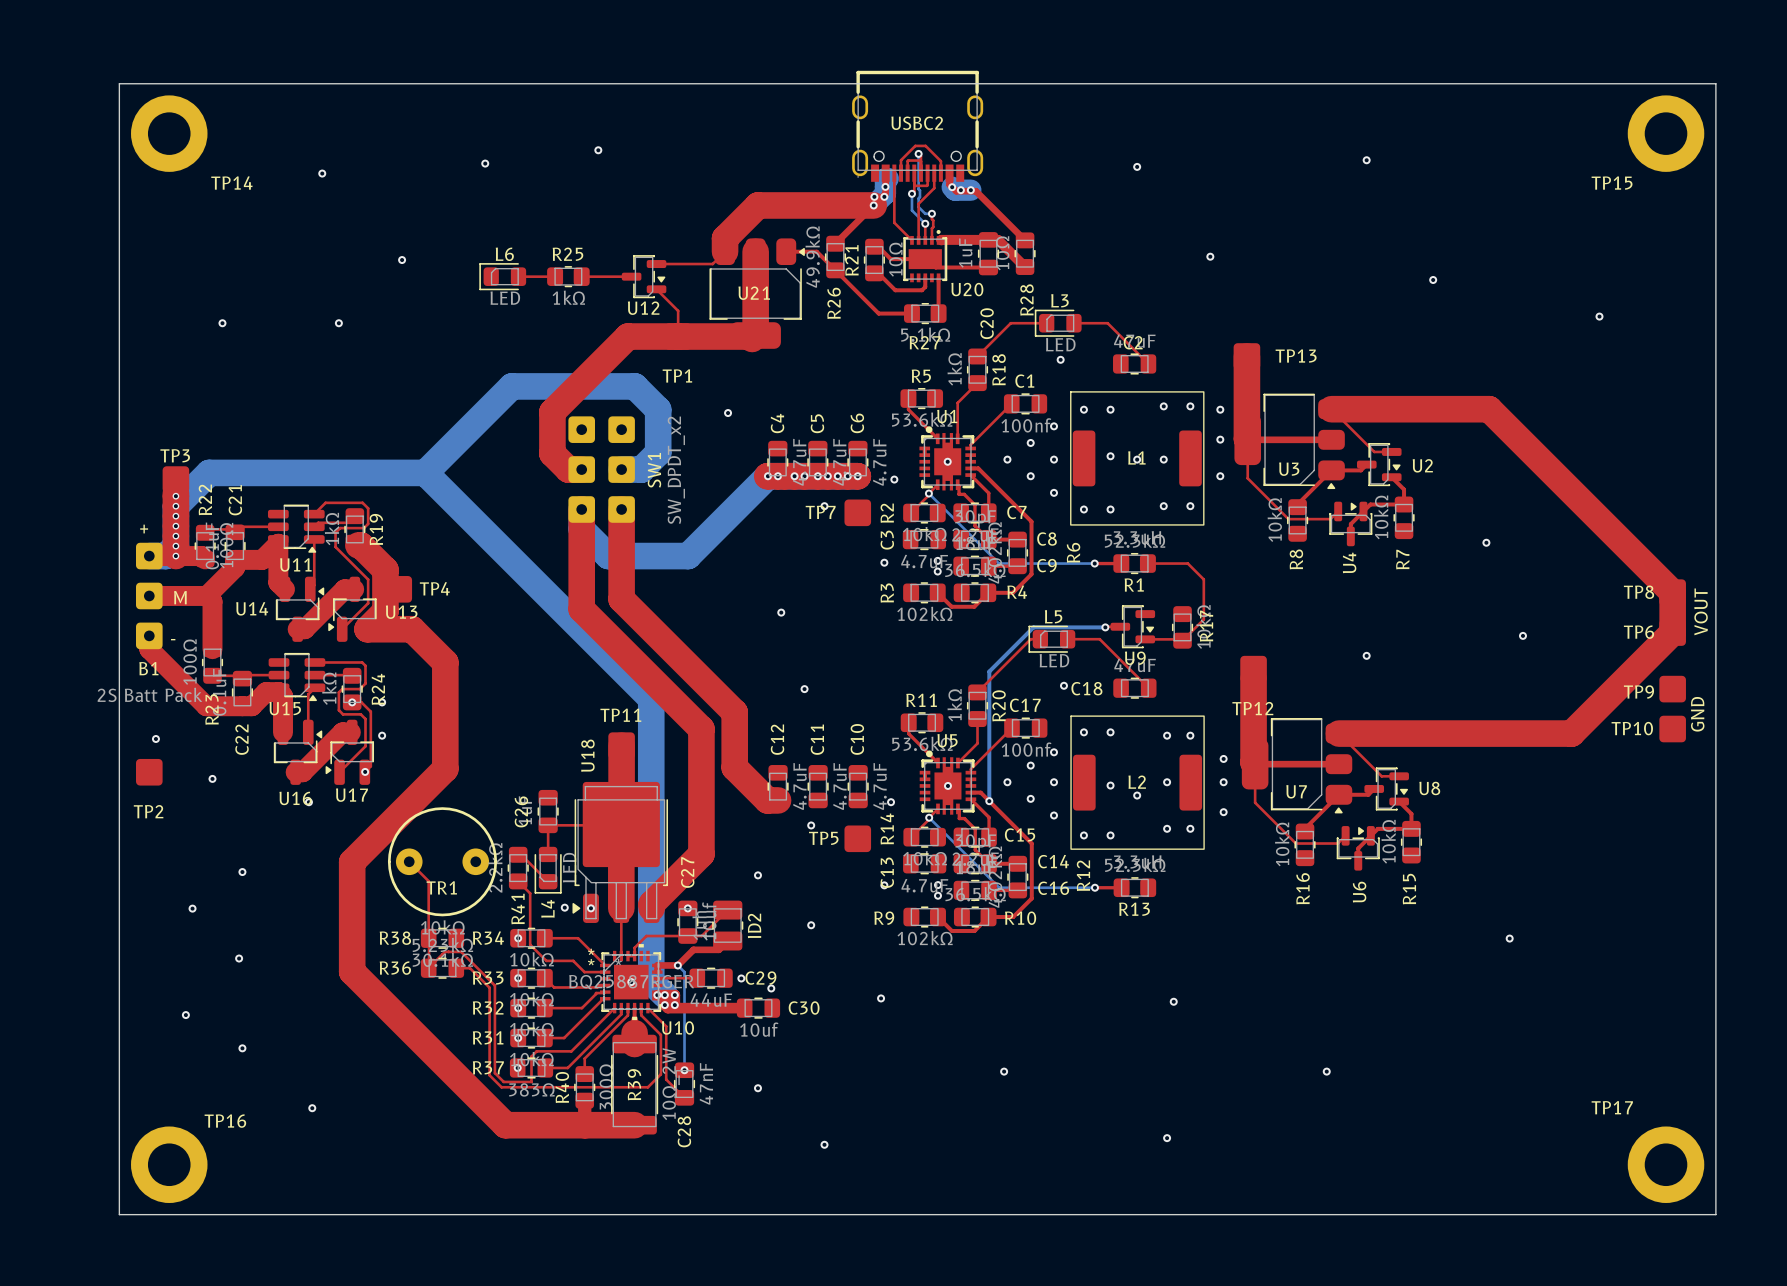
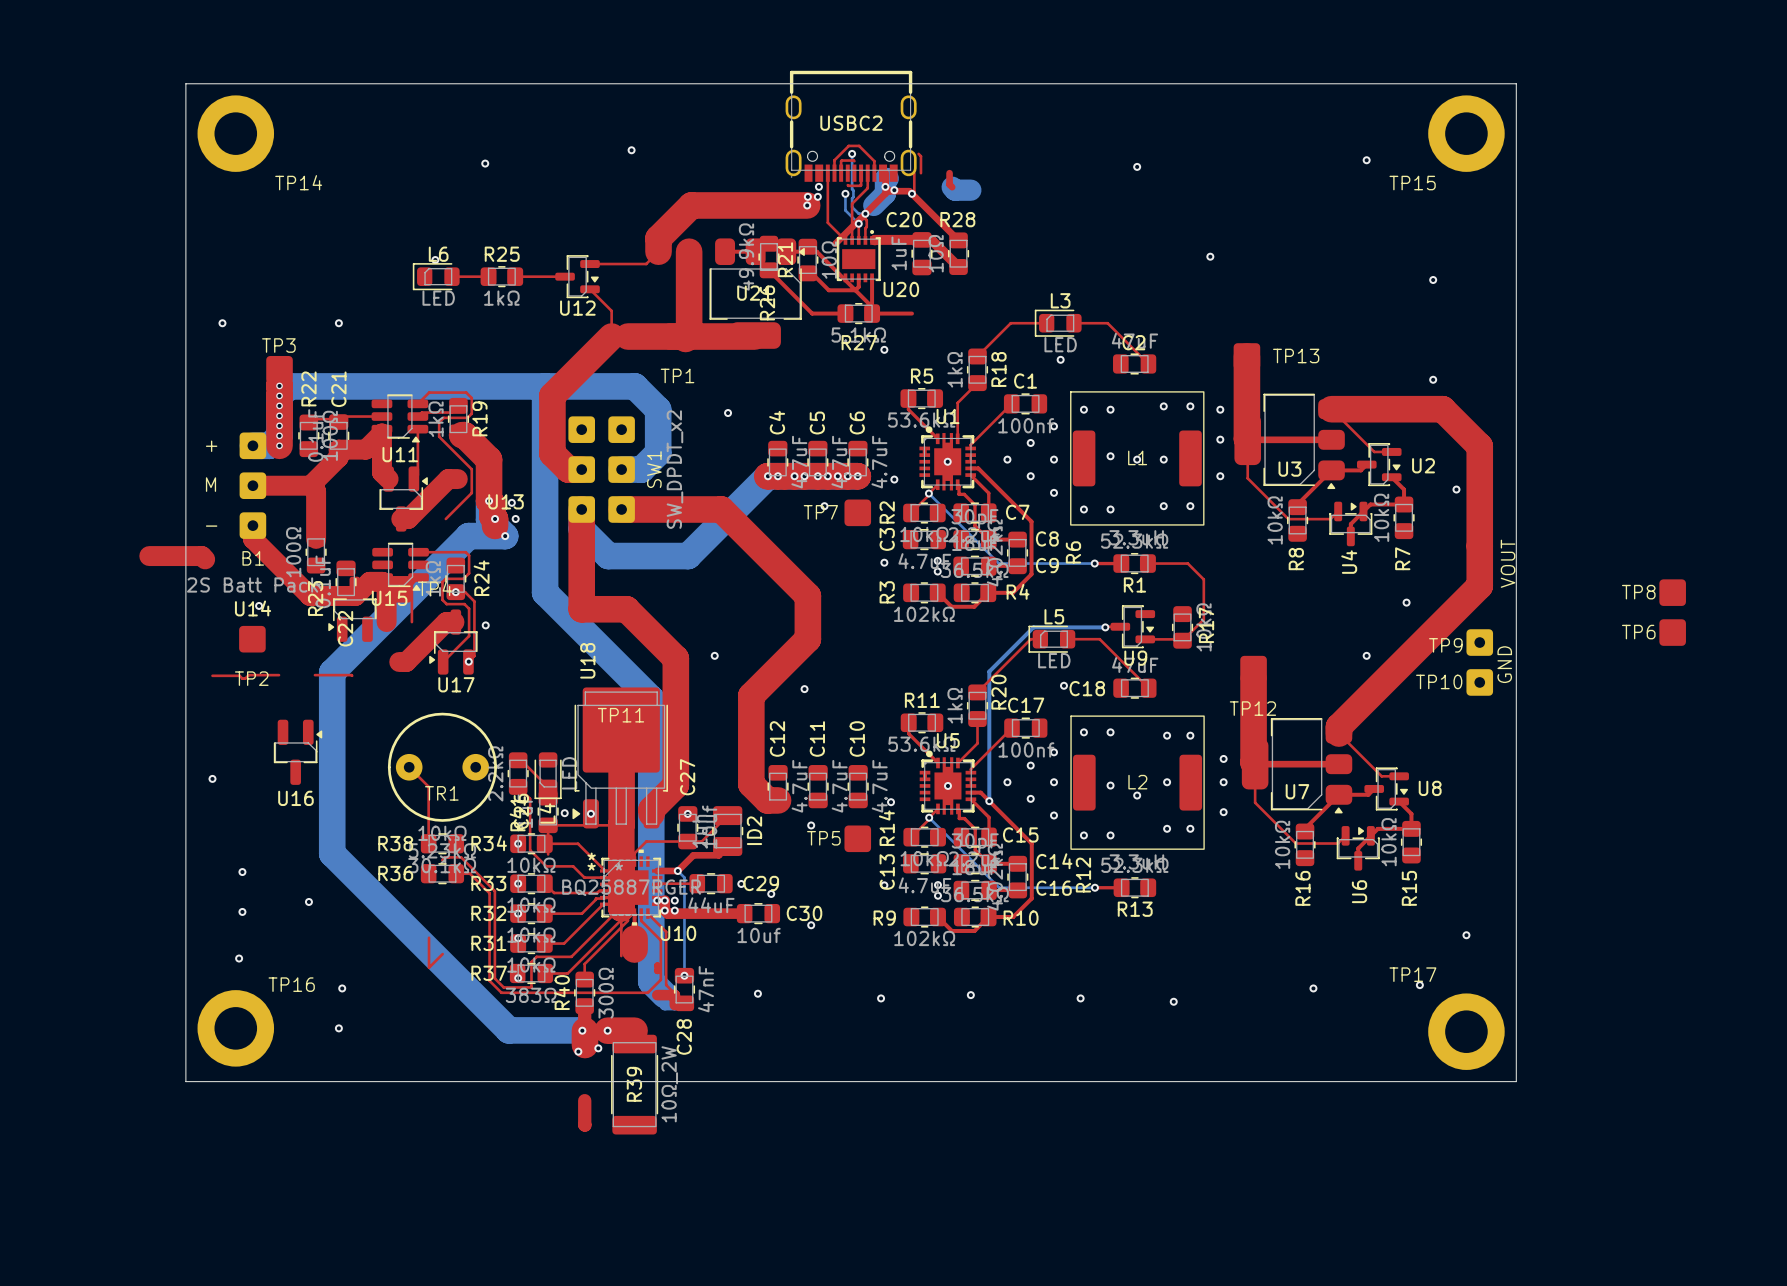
board edge: (185, 83) (119, 83) (119, 1214) (1715, 1214) (1715, 83) (1516, 83) -> (185, 83) (185, 1081) (1516, 1081) (1516, 83)
USBC2 position: (917, 126) -> (851, 126)
TP14 position: (169, 133) -> (235, 133)
TP15 position: (1666, 133) -> (1466, 133)
via position: (598, 150) -> (631, 150)
via: none -> (852, 153)
bottom track: (918, 153) (918, 207) (925, 213) (931, 213) -> (852, 153) (852, 207) (858, 213) (865, 213)
via: (918, 153) -> none
top track: (920, 161) (908, 160) (907, 173) -> (854, 161) (841, 160) (841, 173)
via: (322, 173) -> none
top track: (894, 173) (894, 222) (911, 240) -> (827, 173) (827, 222) (845, 240)
top track: (901, 173) (901, 160) (915, 145) (925, 145) (940, 161) (940, 173) -> (834, 173) (834, 160) (848, 145) (859, 145) (874, 161) (874, 173)
top track: (927, 173) (926, 185) (914, 185) -> (861, 173) (860, 185) (847, 185)
top track: (934, 173) (934, 188) (918, 203) (918, 240) -> (867, 173) (867, 188) (852, 203) (852, 240)
via: none -> (818, 186)
top track: (952, 187) (956, 191) (975, 191) (1025, 240) -> (885, 187) (889, 191) (909, 191) (958, 240)
via: (952, 187) -> none
via: none -> (894, 190)
via: (960, 190) -> none
via: (970, 190) -> none
via: none -> (845, 193)
bottom track: (911, 193) (911, 210) (925, 223) -> (845, 193) (845, 210) (858, 223)
via: none -> (807, 196)
via: none -> (817, 196)
via: (874, 196) -> none
via: (884, 196) -> none
top track: (757, 205) (725, 238) (725, 251) (712, 264) (656, 264) -> (757, 205) (691, 205) (658, 238) (658, 251) (646, 264) (590, 264)
top track: (807, 205) (873, 205) -> none
via: none -> (807, 205)
via: (873, 205) -> none
via: none -> (865, 213)
top track: (931, 213) (931, 240) -> (865, 213) (865, 240)
via: (931, 213) -> none
via: none -> (858, 223)
top track: (925, 223) (925, 240) -> (858, 223) (858, 240)
via: (925, 223) -> none
top track: (941, 240) (997, 239) (1025, 267) -> (874, 240) (931, 239) (958, 267)
top track: (875, 243) (890, 259) (927, 259) (935, 267) (988, 267) -> none
top track: none -> (719, 251) (750, 251) (812, 313) (845, 313)
top track: (755, 251) (755, 335) (752, 338) -> (689, 251) (689, 335) (685, 338)
C20 position: (988, 253) -> (921, 253)
R28 position: (1025, 253) -> (958, 253)
U20 position: (925, 256) -> (858, 256)
R26 position: (835, 257) -> (768, 257)
via position: (402, 260) -> (435, 260)
R21 position: (874, 260) -> (807, 260)
top track: (875, 270) (895, 290) (921, 290) (925, 286) (925, 277) -> (808, 270) (828, 290) (855, 290) (858, 286) (858, 277)
top track: none -> (451, 276) (488, 276)
L6 position: (502, 276) -> (436, 276)
R25 position: (568, 276) -> (501, 276)
top track: (581, 276) (631, 276) -> none
U12 position: (644, 276) -> (577, 276)
top track: (938, 277) (938, 313) -> (872, 277) (872, 313)
top track: (656, 289) (678, 310) (678, 336) -> none
R28 name rotation: 0° (1026, 300) -> 90° clockwise (957, 219)
R28 name position: R28 (1026, 300) -> R28 (957, 219)
R27 position: (925, 313) -> (858, 313)
via: (1599, 316) -> none
C20 name rotation: 0° (987, 323) -> 90° clockwise (904, 219)
C20 name position: C20 (987, 323) -> C20 (904, 219)
top track: (627, 336) (552, 412) -> (590, 289) (611, 310) (611, 336) (552, 395) (552, 412)
via: none -> (884, 349)
via: none -> (1433, 379)
via: none -> (279, 385)
bottom track: (511, 386) (425, 472) -> (511, 386) (288, 386) (279, 395) (279, 435) (269, 445) (252, 445)
via: none -> (279, 395)
via: none -> (279, 405)
top track: (1442, 409) (1489, 409) (1672, 592) (1672, 632) (1571, 733) (1338, 733) -> (1442, 409) (1479, 446) (1479, 585) (1338, 726) (1338, 733)
via: none -> (279, 415)
via: none -> (279, 425)
via: none -> (279, 435)
top track: none -> (462, 435) (464, 435) (489, 459) (489, 501) (492, 504) (495, 525)
via: none -> (279, 445)
bottom track: (425, 472) (545, 592) -> (545, 386) (545, 592)
bottom track: (425, 472) (209, 472) (175, 506) (175, 546) (165, 556) (149, 556) -> none
TP3 position: (175, 479) -> (279, 369)
via: none -> (1456, 489)
top track: (175, 492) (175, 556) -> (279, 382) (279, 445)
via: (175, 496) -> none
bottom track: none -> (489, 501) (489, 519) (505, 536) (468, 536) (332, 672) (332, 853) (508, 1030) (582, 1030)
via: none -> (489, 501)
via: none -> (511, 502)
via: (175, 506) -> none
top track: (621, 509) (621, 599) (734, 712) (734, 767) (751, 784) -> (621, 509) (721, 509) (807, 595) (807, 639) (751, 695) (751, 784)
top track: (314, 514) (325, 502) (362, 502) (368, 508) (368, 523) (363, 528) (340, 528) (335, 532) (335, 546) (368, 579) (368, 603) (342, 629) -> (417, 403) (429, 392) (466, 392) (471, 398) (471, 413) (467, 417) (443, 417) (439, 422) (439, 436) (471, 469) (471, 493) (445, 518)
via: (175, 516) -> none
top track: (354, 516) (348, 522) (318, 522) (314, 526) -> (458, 405) (451, 412) (421, 412) (417, 416)
via: none -> (495, 518)
via: none -> (515, 518)
via: (175, 526) -> none
top track: (278, 526) (240, 526) (235, 532) (232, 529) (205, 529) -> (381, 416) (344, 416) (338, 422) (335, 419) (308, 419)
U11 position: (296, 528) -> (399, 418)
text position: + (144, 529) -> + (211, 446)
R19 position: (354, 529) -> (458, 419)
via: (175, 536) -> none
via: none -> (505, 536)
top track: (314, 539) (314, 585) (310, 589) -> (417, 429) (417, 475) (413, 479)
via: (1486, 542) -> none
top track: (358, 545) (360, 545) (385, 569) (385, 611) (367, 629) (412, 629) (445, 662) (445, 768) (352, 862) (352, 971) (505, 1125) (634, 1125) -> none
via: (175, 546) -> none
R22 position: (205, 546) -> (308, 435)
C21 position: (235, 546) -> (338, 435)
via: (175, 556) -> none
top track: (235, 559) (235, 567) (206, 595) -> (338, 449) (338, 457) (310, 485)
top track: (235, 559) (262, 559) (278, 543) (278, 582) (285, 589) -> (338, 449) (365, 449) (381, 433) (381, 472) (388, 479)
top track: (354, 589) (344, 589) (304, 629) (297, 629) -> (457, 479) (448, 479) (408, 518) (401, 518)
via: none -> (455, 592)
top track: (149, 595) (206, 595) -> (252, 485) (310, 485)
B1 position: (149, 595) -> (252, 485)
top track: (206, 595) (212, 601) (212, 649) -> (310, 485) (316, 491) (316, 538)
text position: M (180, 597) -> M (210, 484)
via: none -> (1406, 602)
via: none -> (259, 605)
U13 position: (300, 609) -> (403, 499)
top track: (581, 609) (701, 729) (701, 854) (651, 904) (651, 908) -> (581, 609) (626, 609) (675, 658) (675, 785) (651, 809) (651, 813)
text position: VOUT (1701, 611) -> VOUT (1508, 563)
via position: (781, 612) -> (714, 655)
via: none -> (485, 625)
top track: (149, 635) (149, 649) (206, 706) (251, 706) (266, 692) (279, 692) (283, 696) (283, 732) -> (252, 525) (252, 538) (309, 595) (355, 595) (369, 581) (382, 581) (386, 585) (386, 622)
via: (1522, 635) -> none
text position: - (173, 639) -> - (211, 526)
via: none -> (468, 661)
R23 position: (212, 662) -> (316, 552)
top track: (314, 662) (362, 662) (365, 665) (365, 683) (359, 689) (342, 689) (338, 692) (338, 710) (343, 714) (360, 714) (365, 719) (365, 746) (339, 772) -> (418, 552) (465, 552) (469, 555) (469, 573) (463, 578) (445, 578) (442, 582) (442, 599) (446, 604) (464, 604) (469, 608) (469, 636) (443, 661)
TP9 footprint: [1659, 675, 1686, 703] -> [1466, 629, 1494, 656]
U15 position: (296, 677) -> (400, 566)
top track: (314, 687) (308, 694) (308, 732) -> (418, 577) (411, 584) (411, 622)
R24 position: (352, 689) -> (455, 578)
C22 position: (242, 692) -> (346, 582)
top track: (352, 702) (361, 702) (370, 711) (370, 766) (364, 772) -> (455, 592) (465, 592) (474, 601) (474, 656) (468, 661)
via: (352, 702) -> none
via: (382, 702) -> none
R20 name position: R20 (999, 705) -> R20 (998, 692)
text position: GND (1697, 714) -> GND (1504, 664)
TP10 footprint: [1659, 715, 1686, 743] -> [1466, 669, 1494, 696]
top track: (350, 732) (342, 732) (302, 772) (295, 772) -> (454, 622) (446, 622) (406, 661) (399, 661)
via: (382, 735) -> none
via: (155, 738) -> none
U17 position: (349, 752) -> (453, 642)
via: (365, 771) -> none
TP2 position: (149, 772) -> (252, 639)
via: (308, 802) -> none
via: none -> (564, 813)
via: none -> (590, 813)
via: none -> (687, 813)
via: none -> (518, 843)
U18 position: (620, 852) -> (620, 757)
top track: (518, 854) (521, 854) (548, 881) -> (518, 760) (521, 760) (548, 787)
top track: (409, 861) (428, 881) (428, 938) -> (409, 767) (428, 786) (428, 843)
TR1 position: (442, 861) -> (442, 767)
R41 position: (518, 868) -> (518, 773)
L4 position: (548, 870) -> (548, 775)
via: none -> (677, 870)
via: (757, 875) -> none
top track: (518, 881) (530, 893) (530, 944) (546, 960) (573, 960) (584, 972) (605, 972) -> (518, 786) (530, 798) (530, 850) (546, 866) (573, 866) (584, 877) (605, 877)
via: none -> (518, 883)
via: none -> (741, 883)
via: none -> (771, 893)
via: none -> (657, 900)
via: none -> (664, 900)
via: none -> (674, 900)
via: none -> (308, 901)
via: (564, 907) -> none
via position: (192, 908) -> (242, 911)
via: (590, 908) -> none
via: (687, 908) -> none
via: none -> (664, 910)
via: none -> (674, 910)
top track: (727, 910) (701, 936) (646, 936) (634, 947) (634, 956) (627, 956) -> (727, 815) (701, 841) (646, 841) (634, 853) (634, 861) (627, 861)
via: none -> (518, 913)
C27 position: (687, 922) -> (687, 827)
ID2 position: (727, 925) -> (727, 831)
R38 position: (442, 938) -> (442, 843)
R34 position: (531, 938) -> (531, 843)
top track: (544, 938) (578, 938) (605, 965) -> (544, 843) (578, 843) (605, 870)
via position: (1509, 938) -> (1466, 935)
top track: (727, 941) (718, 949) (693, 949) (677, 965) -> (727, 846) (718, 855) (693, 855) (677, 870)
top track: (442, 954) (445, 951) (461, 951) (494, 985) (494, 1073) (503, 1081) (531, 1081) (531, 1056) (536, 1051) (571, 1051) (614, 1008) -> (442, 860) (444, 857) (461, 857) (494, 891) (494, 978) (503, 987) (531, 987) (531, 962) (536, 956) (571, 956) (614, 913)
top track: (677, 965) (657, 965) (657, 967) -> (677, 870) (657, 870) (657, 873)
bottom track: (677, 965) (684, 972) (684, 1070) -> (677, 870) (684, 877) (684, 975)
via: (677, 965) -> none
R36 position: (442, 968) -> (442, 873)
top track: (456, 968) (470, 968) (489, 987) (489, 1075) (501, 1087) (647, 1087) (660, 1074) (660, 1034) (641, 1015) (641, 1008) -> (456, 873) (469, 873) (489, 893) (489, 980) (501, 992) (647, 992) (660, 979) (660, 940) (641, 920) (641, 913)
via: none -> (684, 975)
R33 position: (531, 978) -> (531, 883)
top track: (544, 978) (554, 987) (597, 987) (605, 985) -> (544, 883) (554, 892) (597, 892) (605, 890)
top track: (697, 978) (657, 978) (657, 985) -> (697, 883) (657, 883) (657, 890)
C29 position: (711, 978) -> (711, 883)
via: (741, 978) -> none
U10 position: (631, 982) -> (631, 887)
via: (631, 982) -> none
via: none -> (1419, 985)
via: none -> (342, 988)
via: (771, 988) -> none
via: none -> (1313, 988)
top track: (605, 992) (596, 993) (581, 1008) (544, 1008) -> (605, 897) (596, 898) (581, 913) (544, 913)
via: none -> (757, 993)
via: (657, 995) -> none
top track: (664, 995) (664, 1005) (667, 1008) (744, 1008) -> (664, 900) (664, 910) (667, 913) (744, 913)
via: (664, 995) -> none
via: (674, 995) -> none
via: none -> (970, 995)
top track: (605, 998) (564, 1038) (544, 1038) -> (605, 904) (564, 943) (544, 943)
via: none -> (1080, 998)
via: (664, 1005) -> none
via: (674, 1005) -> none
top track: none -> (584, 1006) (584, 1028) (582, 1030) (584, 1030) (584, 1045)
via: (518, 1008) -> none
R32 position: (531, 1008) -> (531, 913)
top track: (621, 1008) (621, 1014) (567, 1067) (545, 1067) -> (621, 913) (621, 919) (567, 973) (545, 973)
top track: (627, 1008) (627, 1015) (584, 1058) (584, 1074) -> (627, 913) (627, 920) (584, 964) (584, 979)
top track: (634, 1008) (634, 1044) -> (634, 913) (634, 949)
top track: (647, 1008) (666, 1026) (666, 1079) (684, 1097) -> (647, 913) (666, 931) (666, 985) (684, 1003)
C30 position: (758, 1008) -> (758, 913)
via: (185, 1015) -> none
via: none -> (338, 1028)
via: none -> (582, 1030)
top track: none -> (607, 1030) (634, 1030)
via: none -> (607, 1030)
via: (518, 1038) -> none
R31 position: (531, 1038) -> (531, 943)
via: (242, 1048) -> none
via: none -> (598, 1048)
via: none -> (578, 1051)
via: (517, 1067) -> none
R37 position: (531, 1067) -> (531, 973)
via: (684, 1070) -> none
via: (1004, 1071) -> none
via: (1326, 1071) -> none
C28 position: (684, 1084) -> (684, 989)
R40 position: (584, 1087) -> (584, 992)
via: (757, 1088) -> none
via: (312, 1108) -> none
via: (1167, 1138) -> none
via: (824, 1144) -> none
TP16 position: (169, 1164) -> (235, 1028)
TP17 position: (1666, 1164) -> (1466, 1031)

